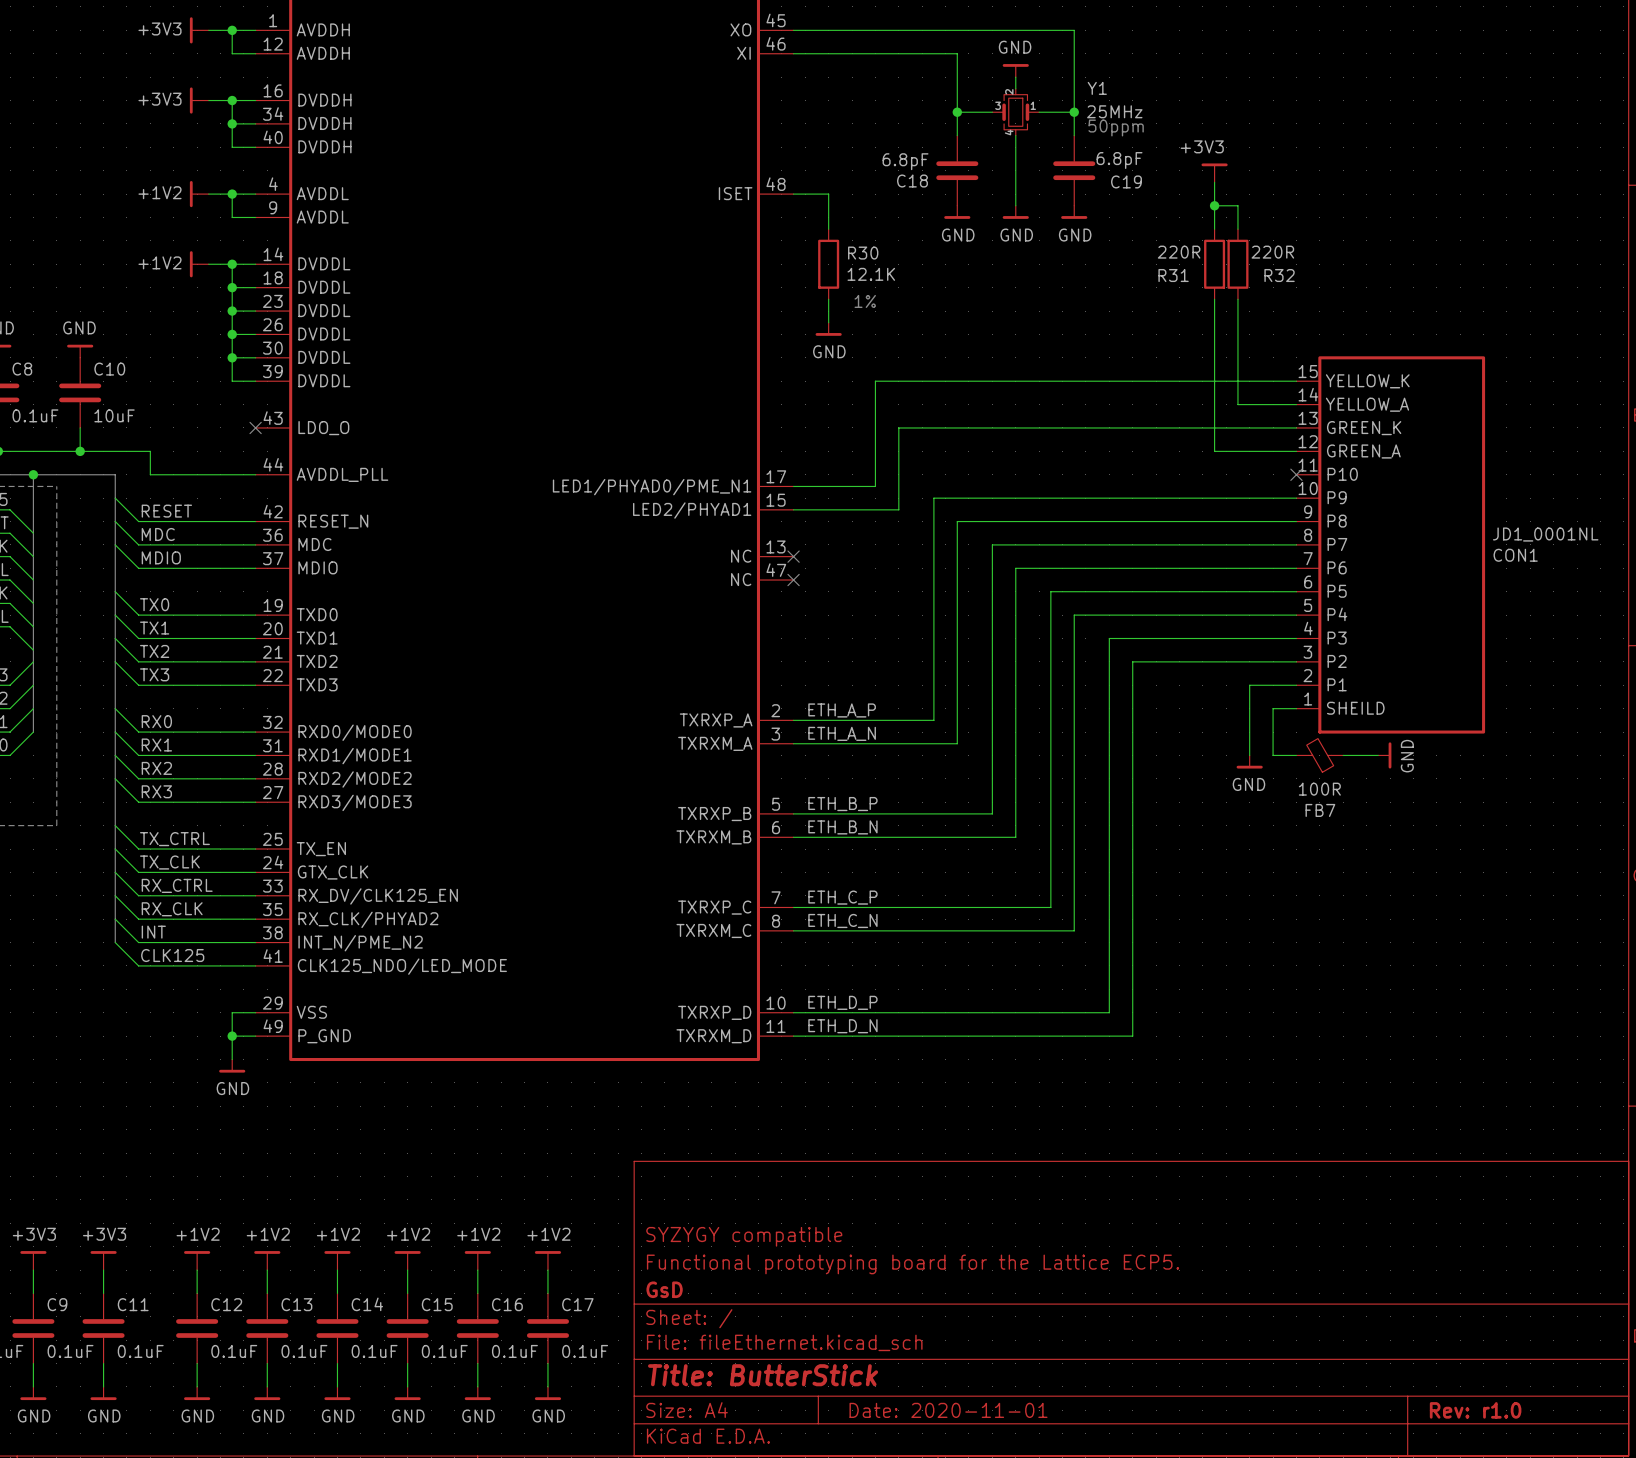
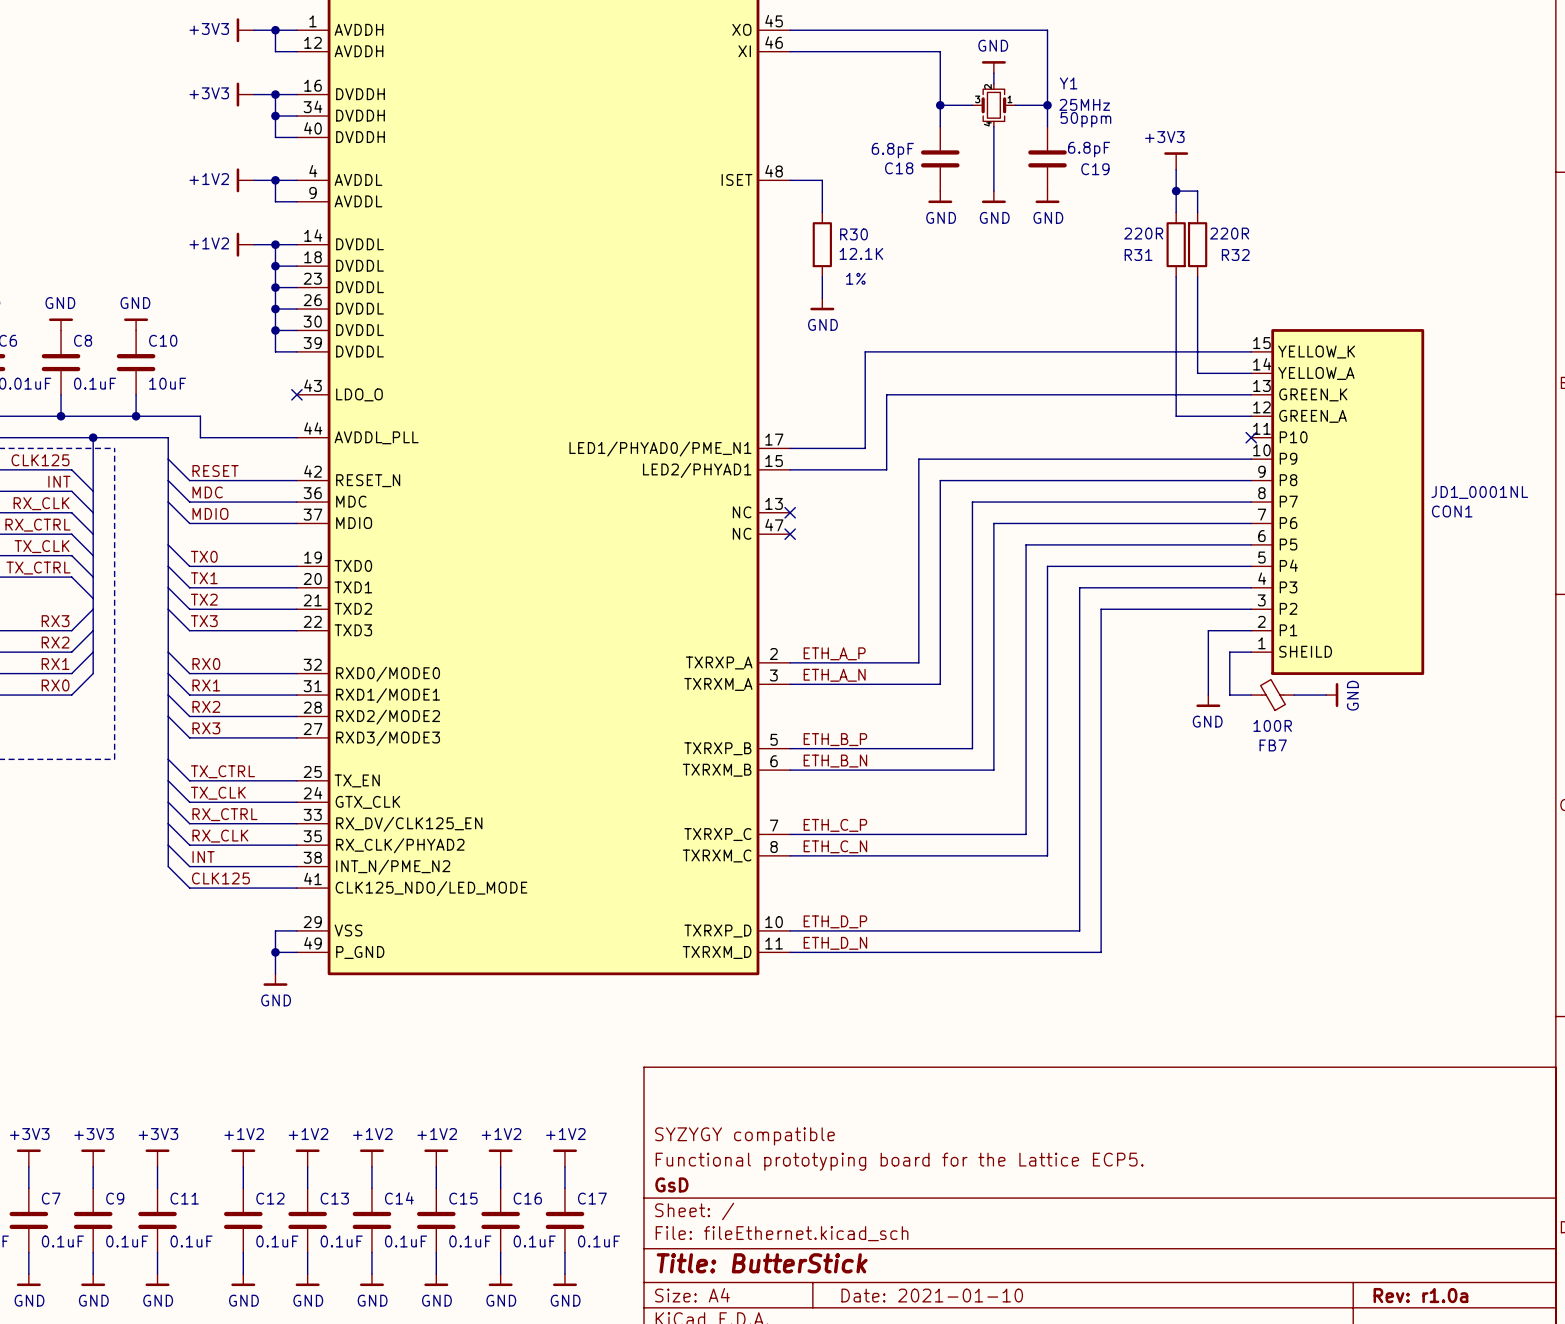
title block: Date: 2020-11-01 (948, 1410) -> Date: 2021-01-10 (932, 1295)
title block: Rev: r1.0 (1475, 1410) -> Rev: r1.0a (1420, 1295)

